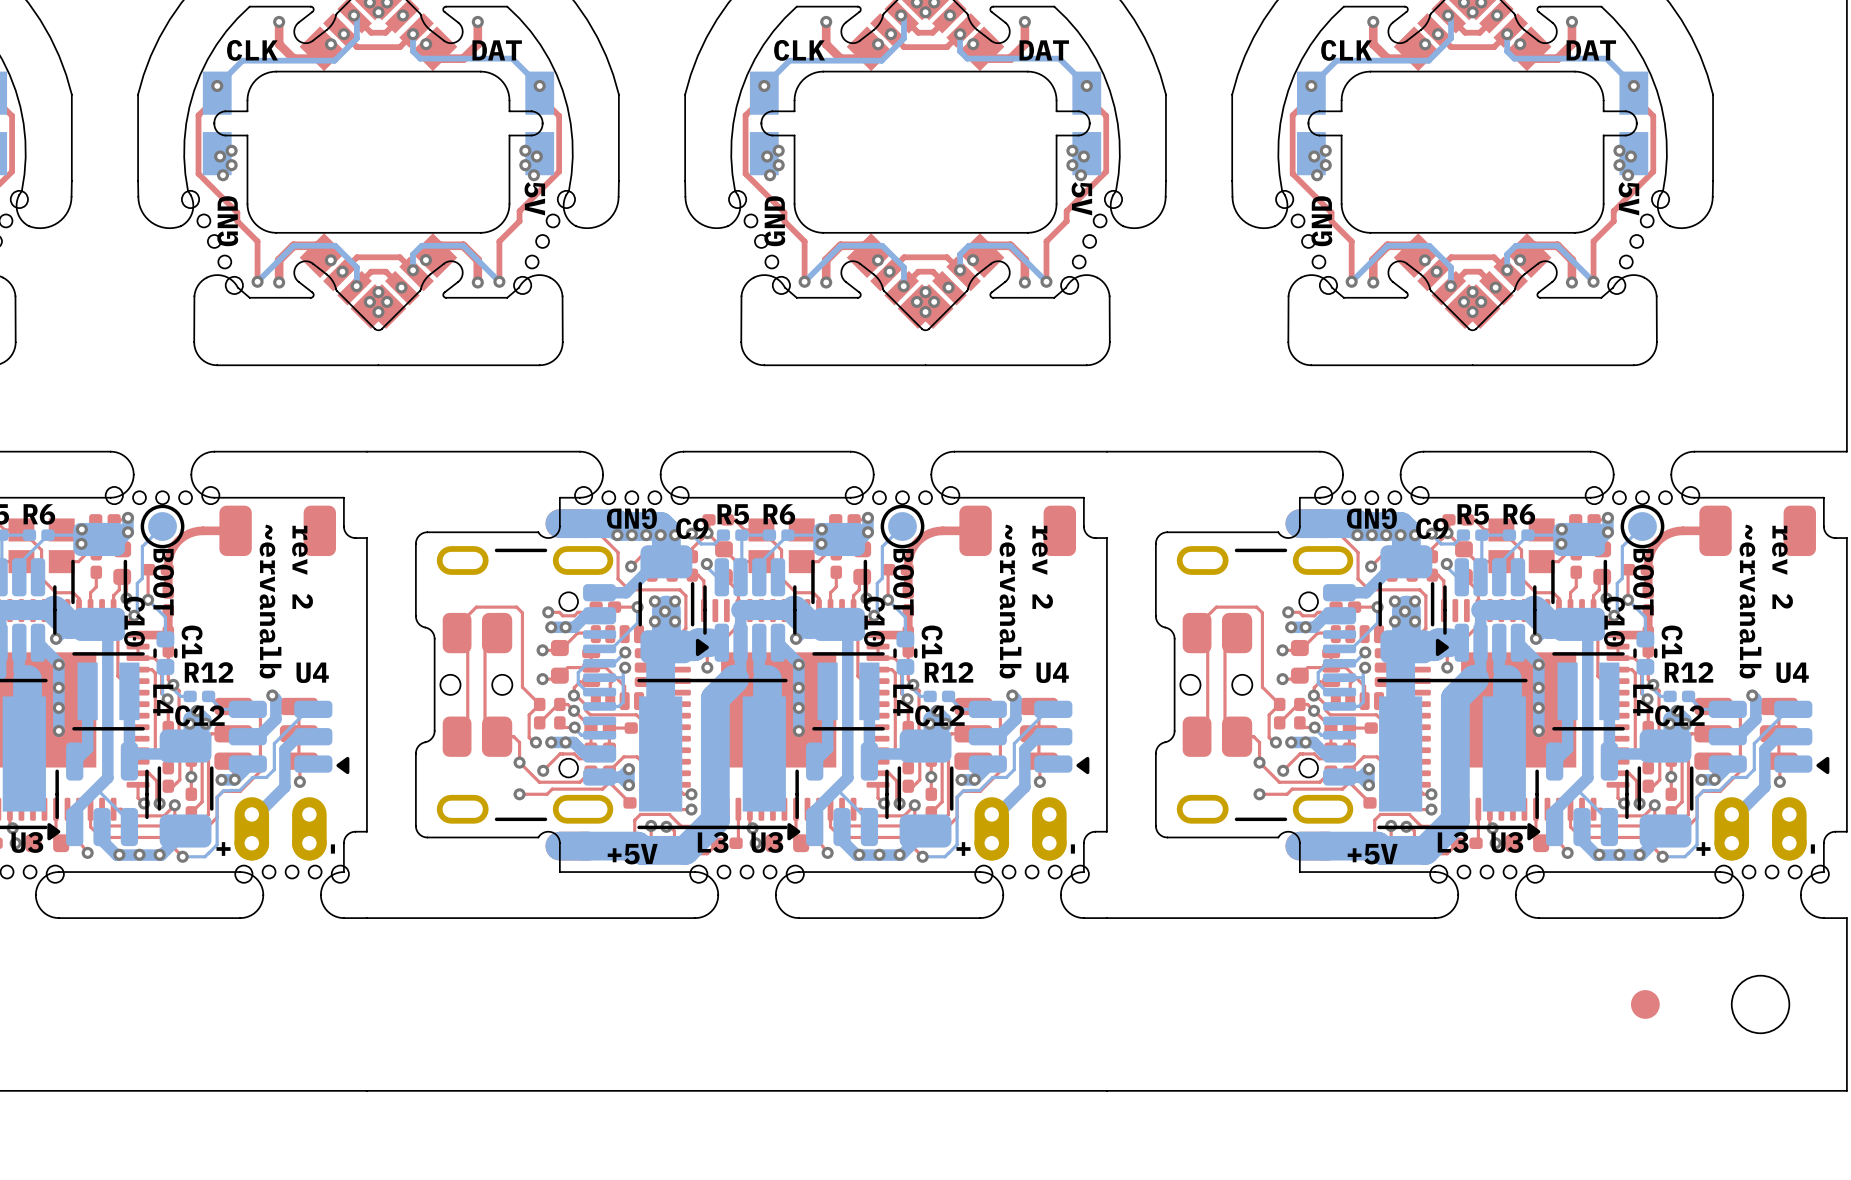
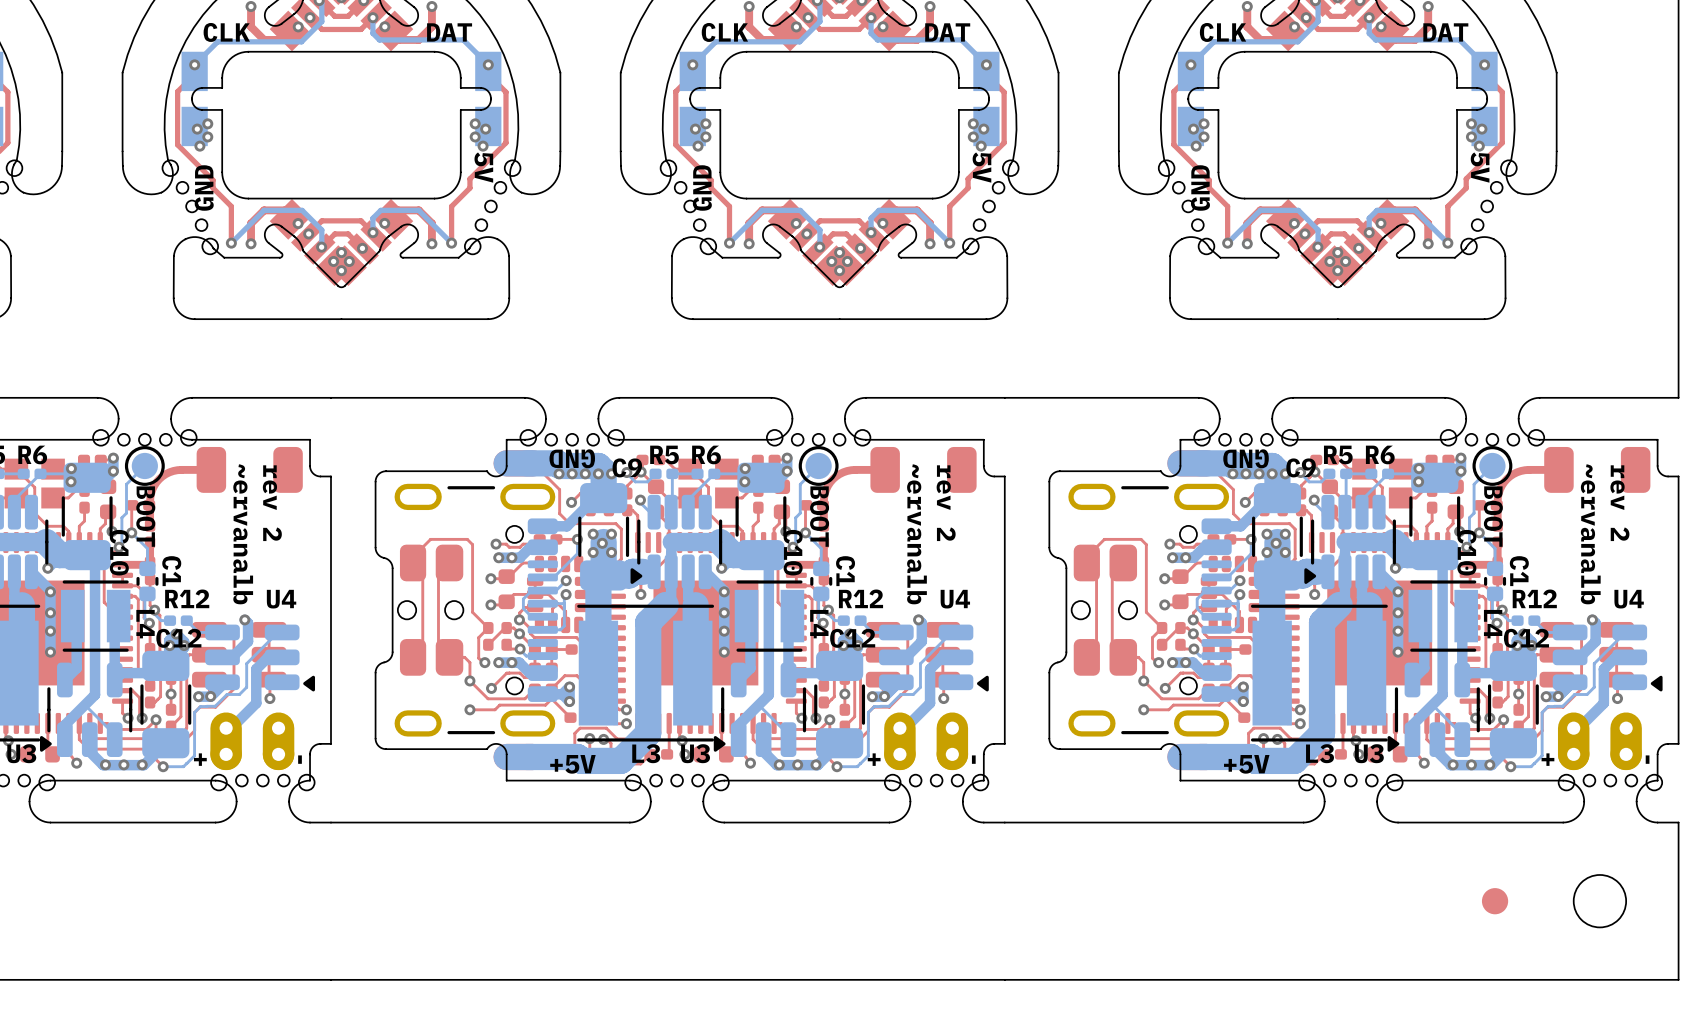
L4 footprint: [72, 652, 145, 731] -> [60, 580, 131, 652]
L4 footprint: [812, 652, 885, 731] -> [734, 580, 805, 652]
L4 footprint: [1552, 652, 1625, 731] -> [1408, 580, 1479, 652]

